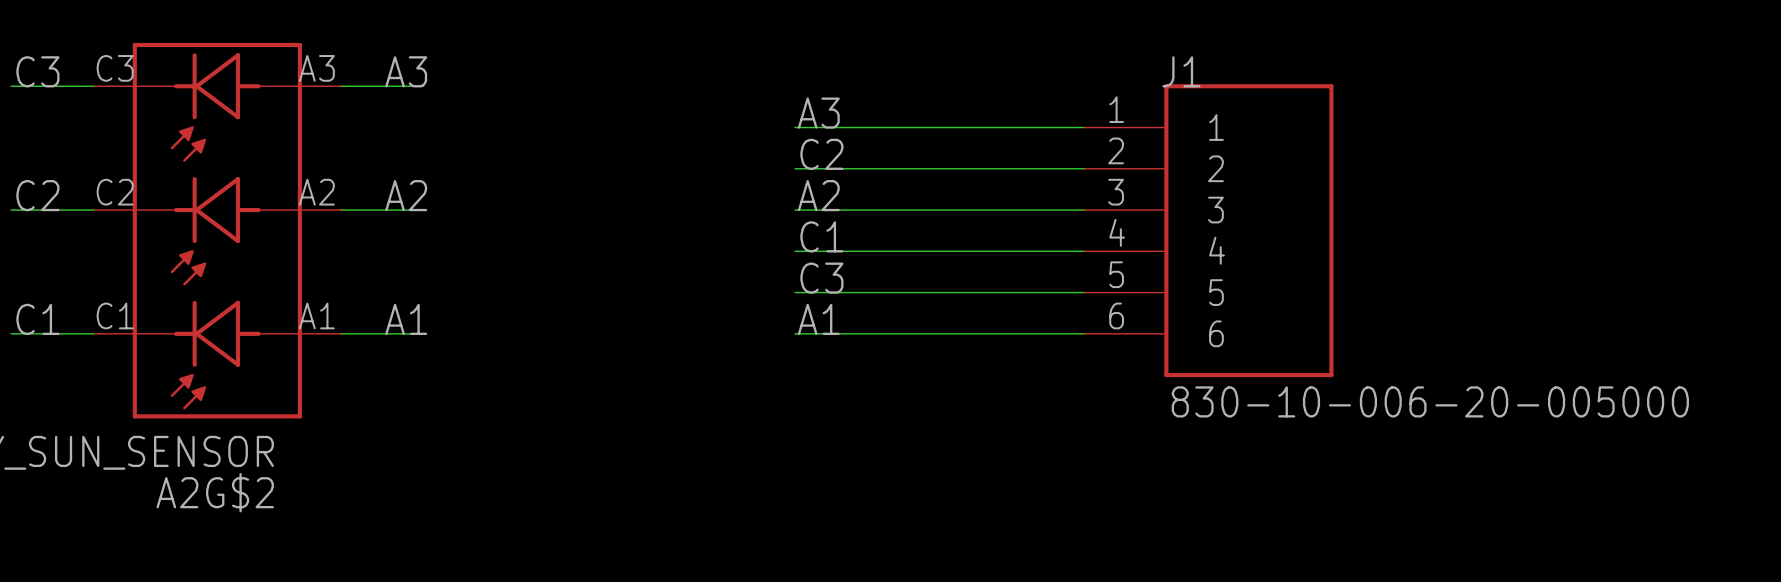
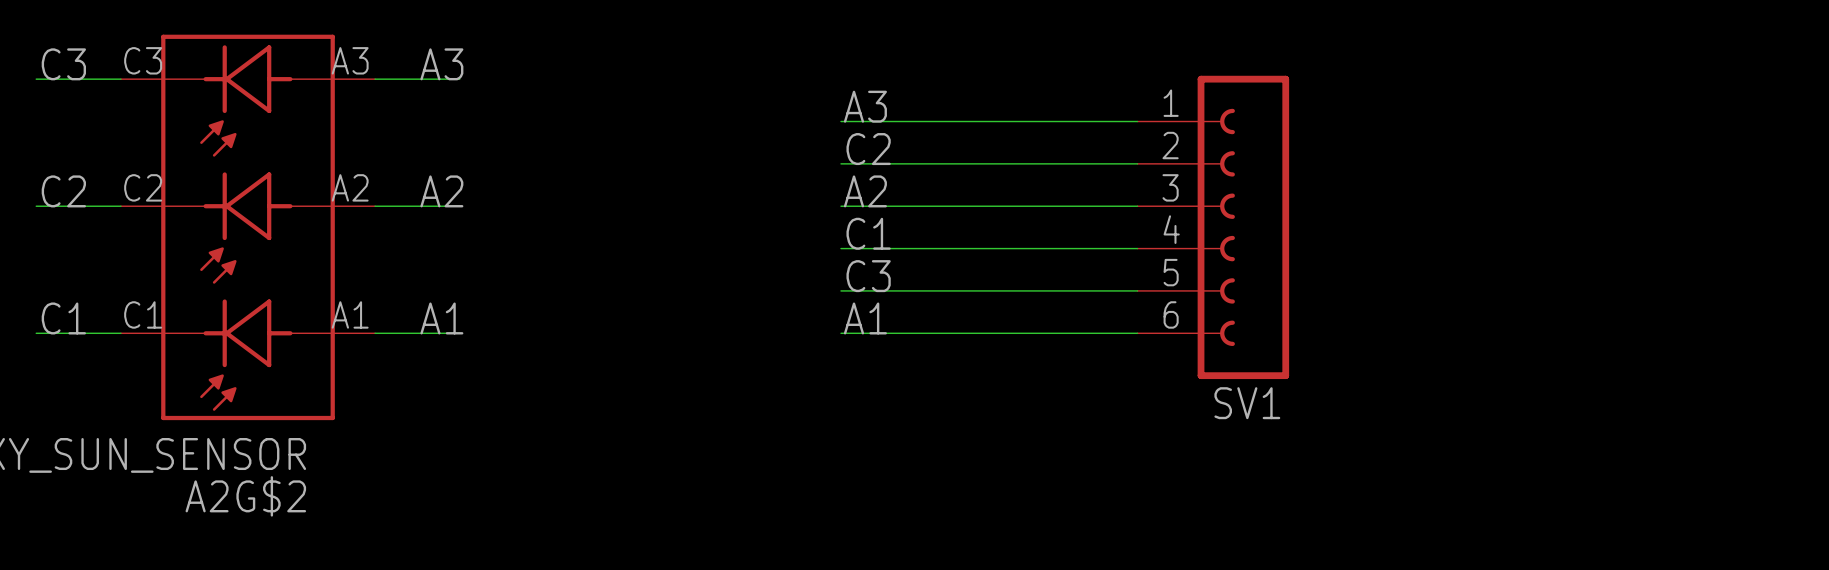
SV1: none -> (1213, 227)
J1: 830-10-006-20-005000 (1208, 230) -> none

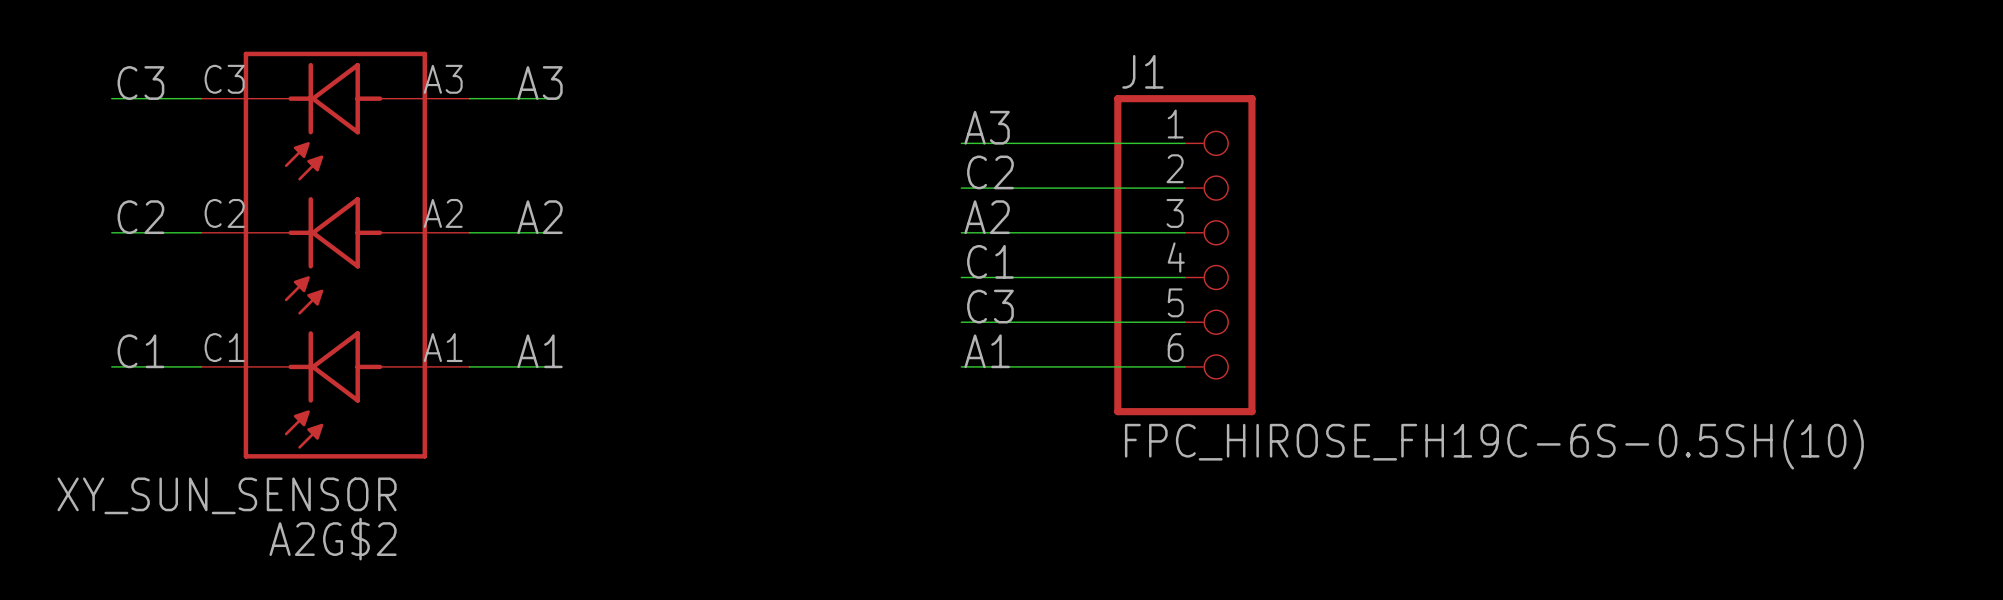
wire: (1052, 121) (1137, 121) -> none
wire: (1052, 163) (1137, 163) -> none
wire: (1052, 206) (1137, 206) -> none
J1: none -> FPC_HIROSE_FH19C-6S-0.5SH(10) (1184, 255)
SV1: (1213, 227) -> none
wire: (1052, 248) (1137, 248) -> none
wire: (1052, 290) (1137, 290) -> none
wire: (1052, 333) (1137, 333) -> none

